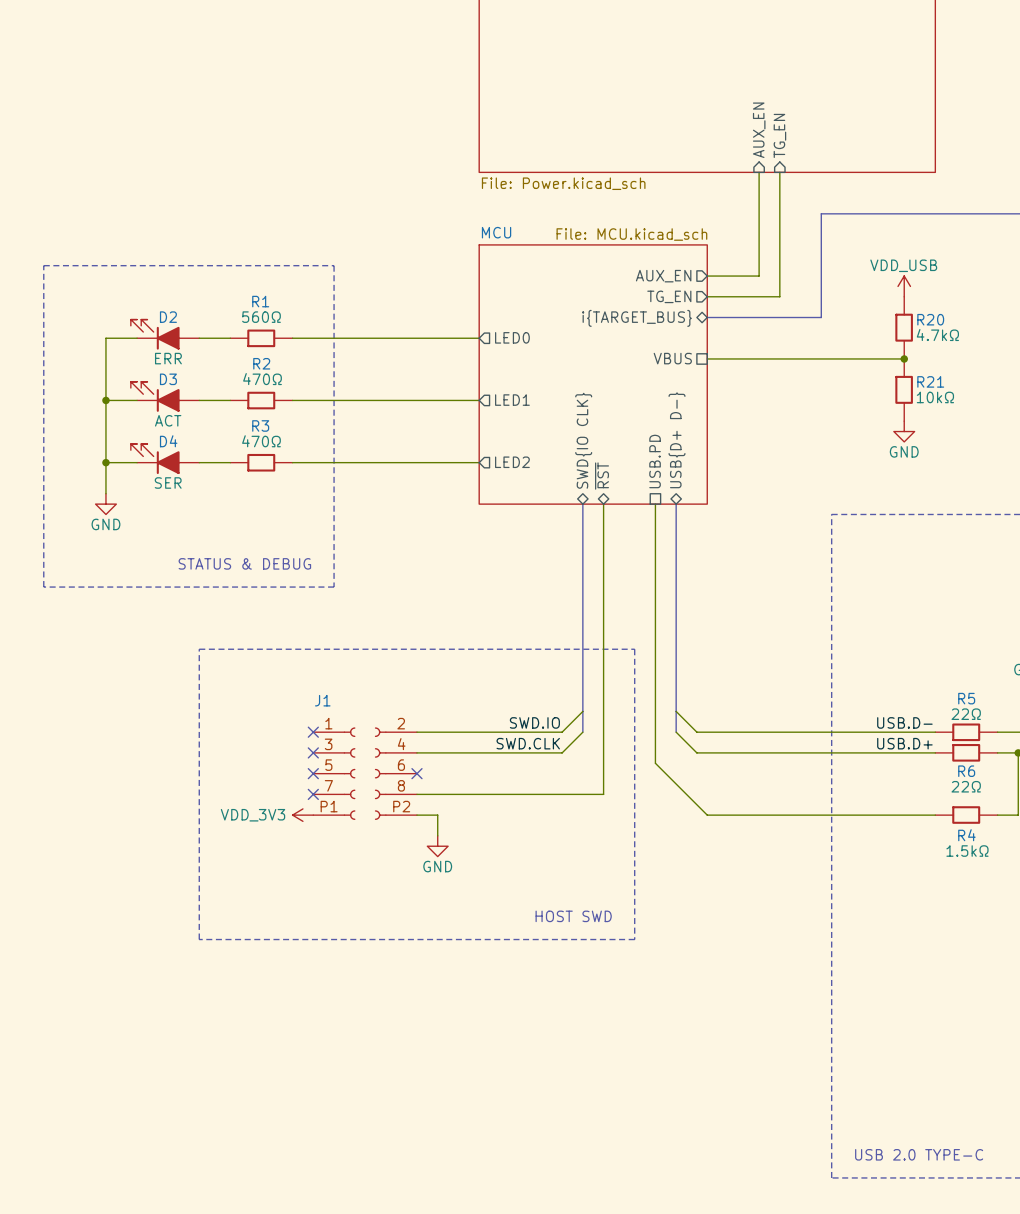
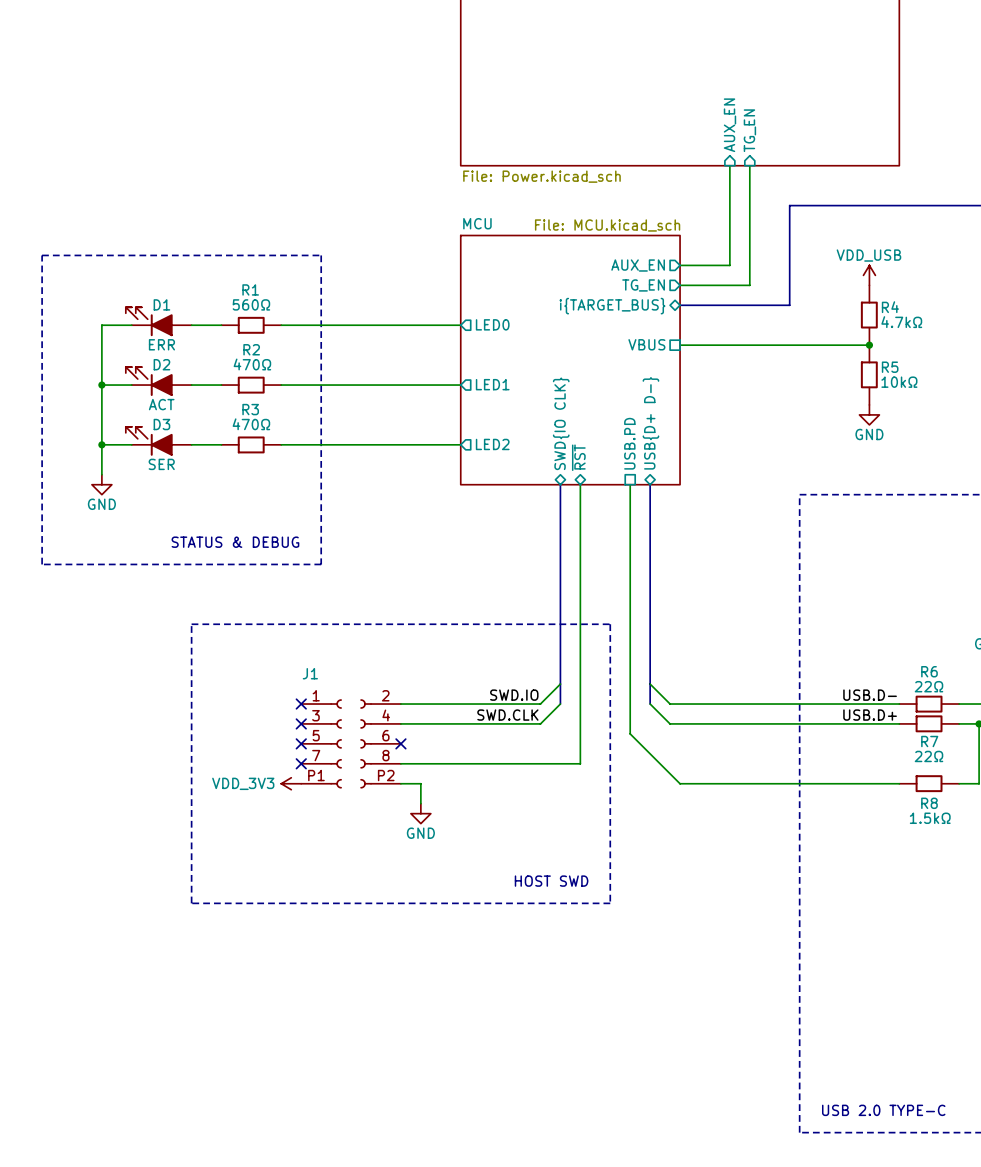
D2 name: D2 (168, 317) -> D1 (161, 304)
R20 name: R20 (930, 319) -> R4 (890, 307)
D3 name: D3 (168, 379) -> D2 (161, 364)
R21 name: R21 (930, 381) -> R5 (890, 367)
D4 name: D4 (168, 441) -> D3 (161, 424)
R5 name: R5 (966, 698) -> R6 (929, 671)
R6 name: R6 (966, 771) -> R7 (929, 741)
R4 name: R4 (966, 835) -> R8 (929, 803)

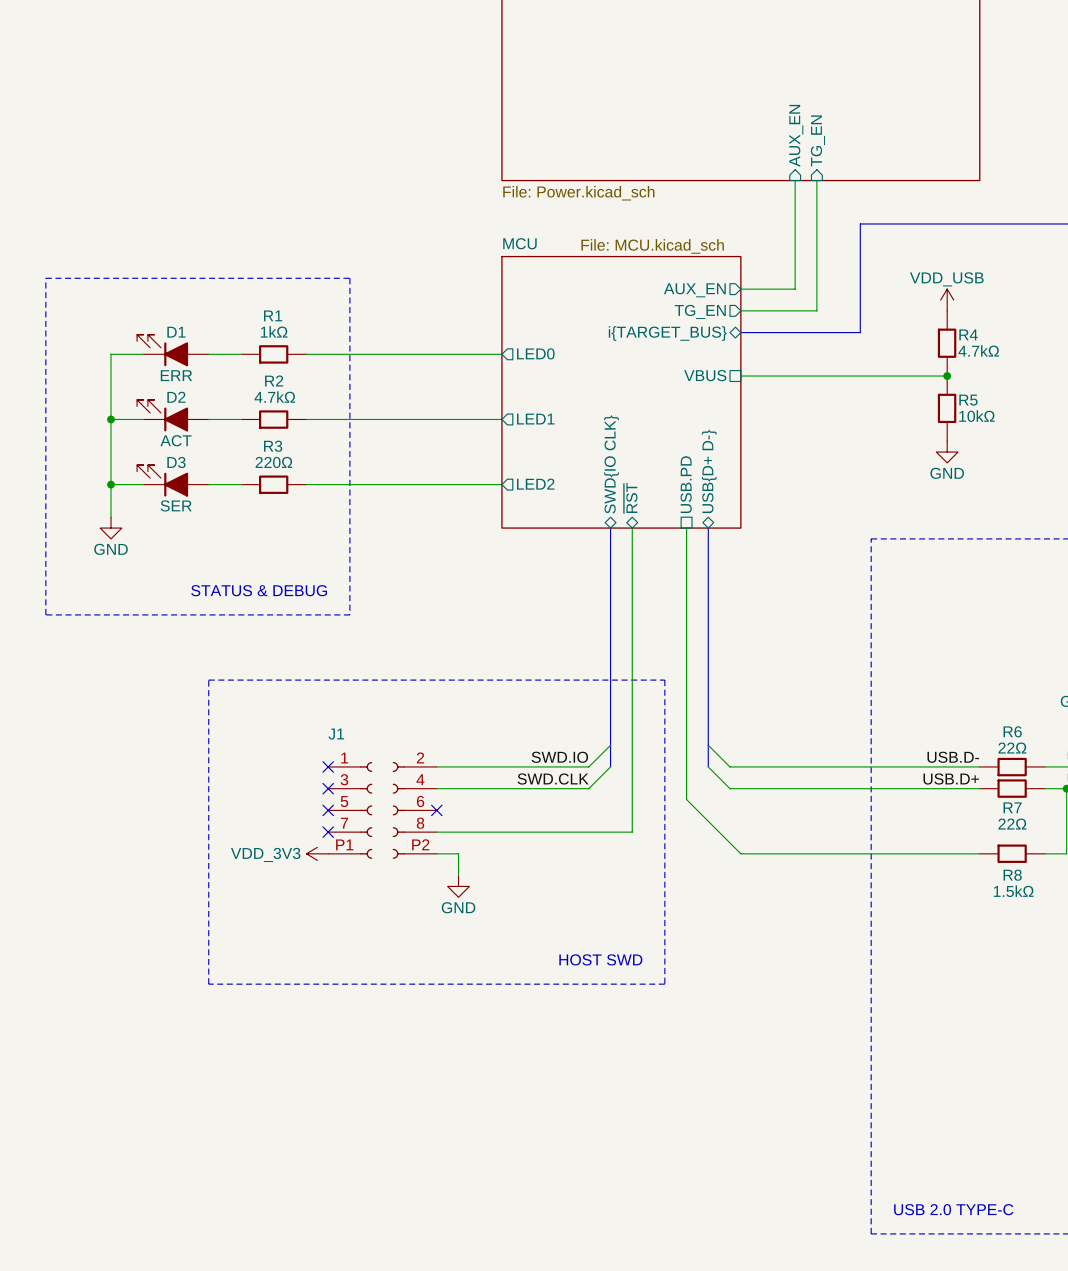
R1 value: 560Ω (251, 304) -> 1kΩ (274, 331)
R2 value: 470Ω (252, 364) -> 4.7kΩ (274, 397)
R3 value: 470Ω (251, 424) -> 220Ω (273, 462)

